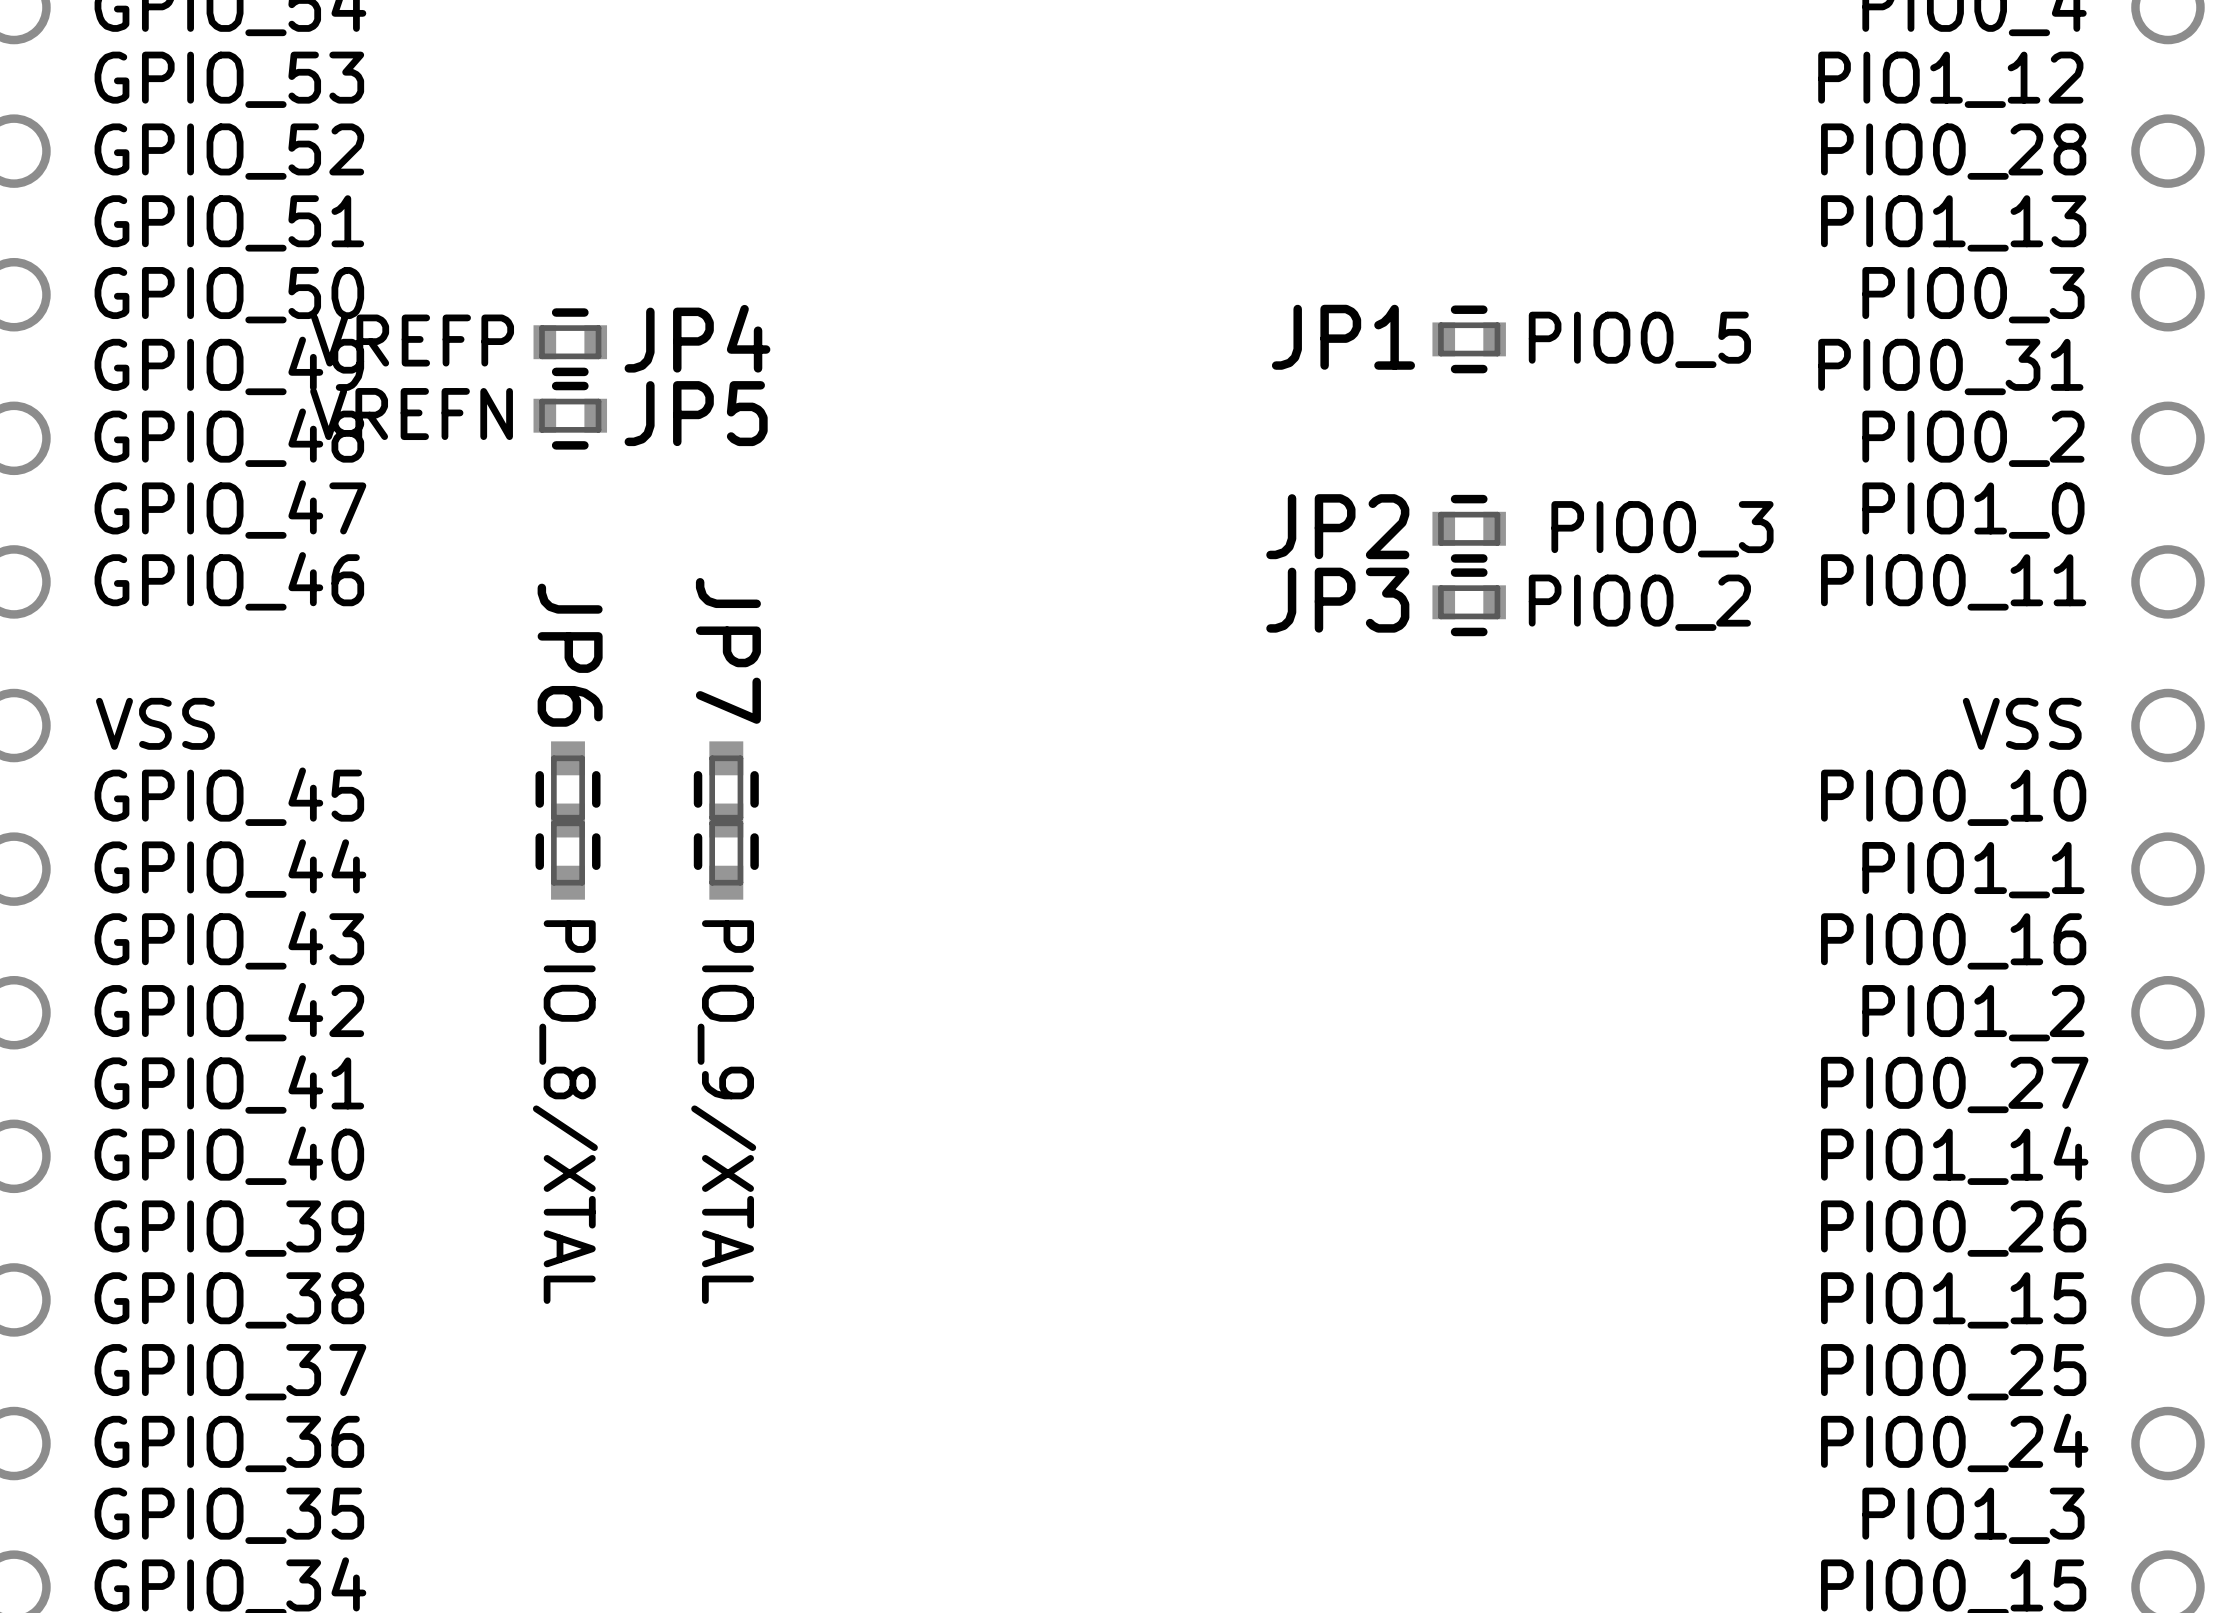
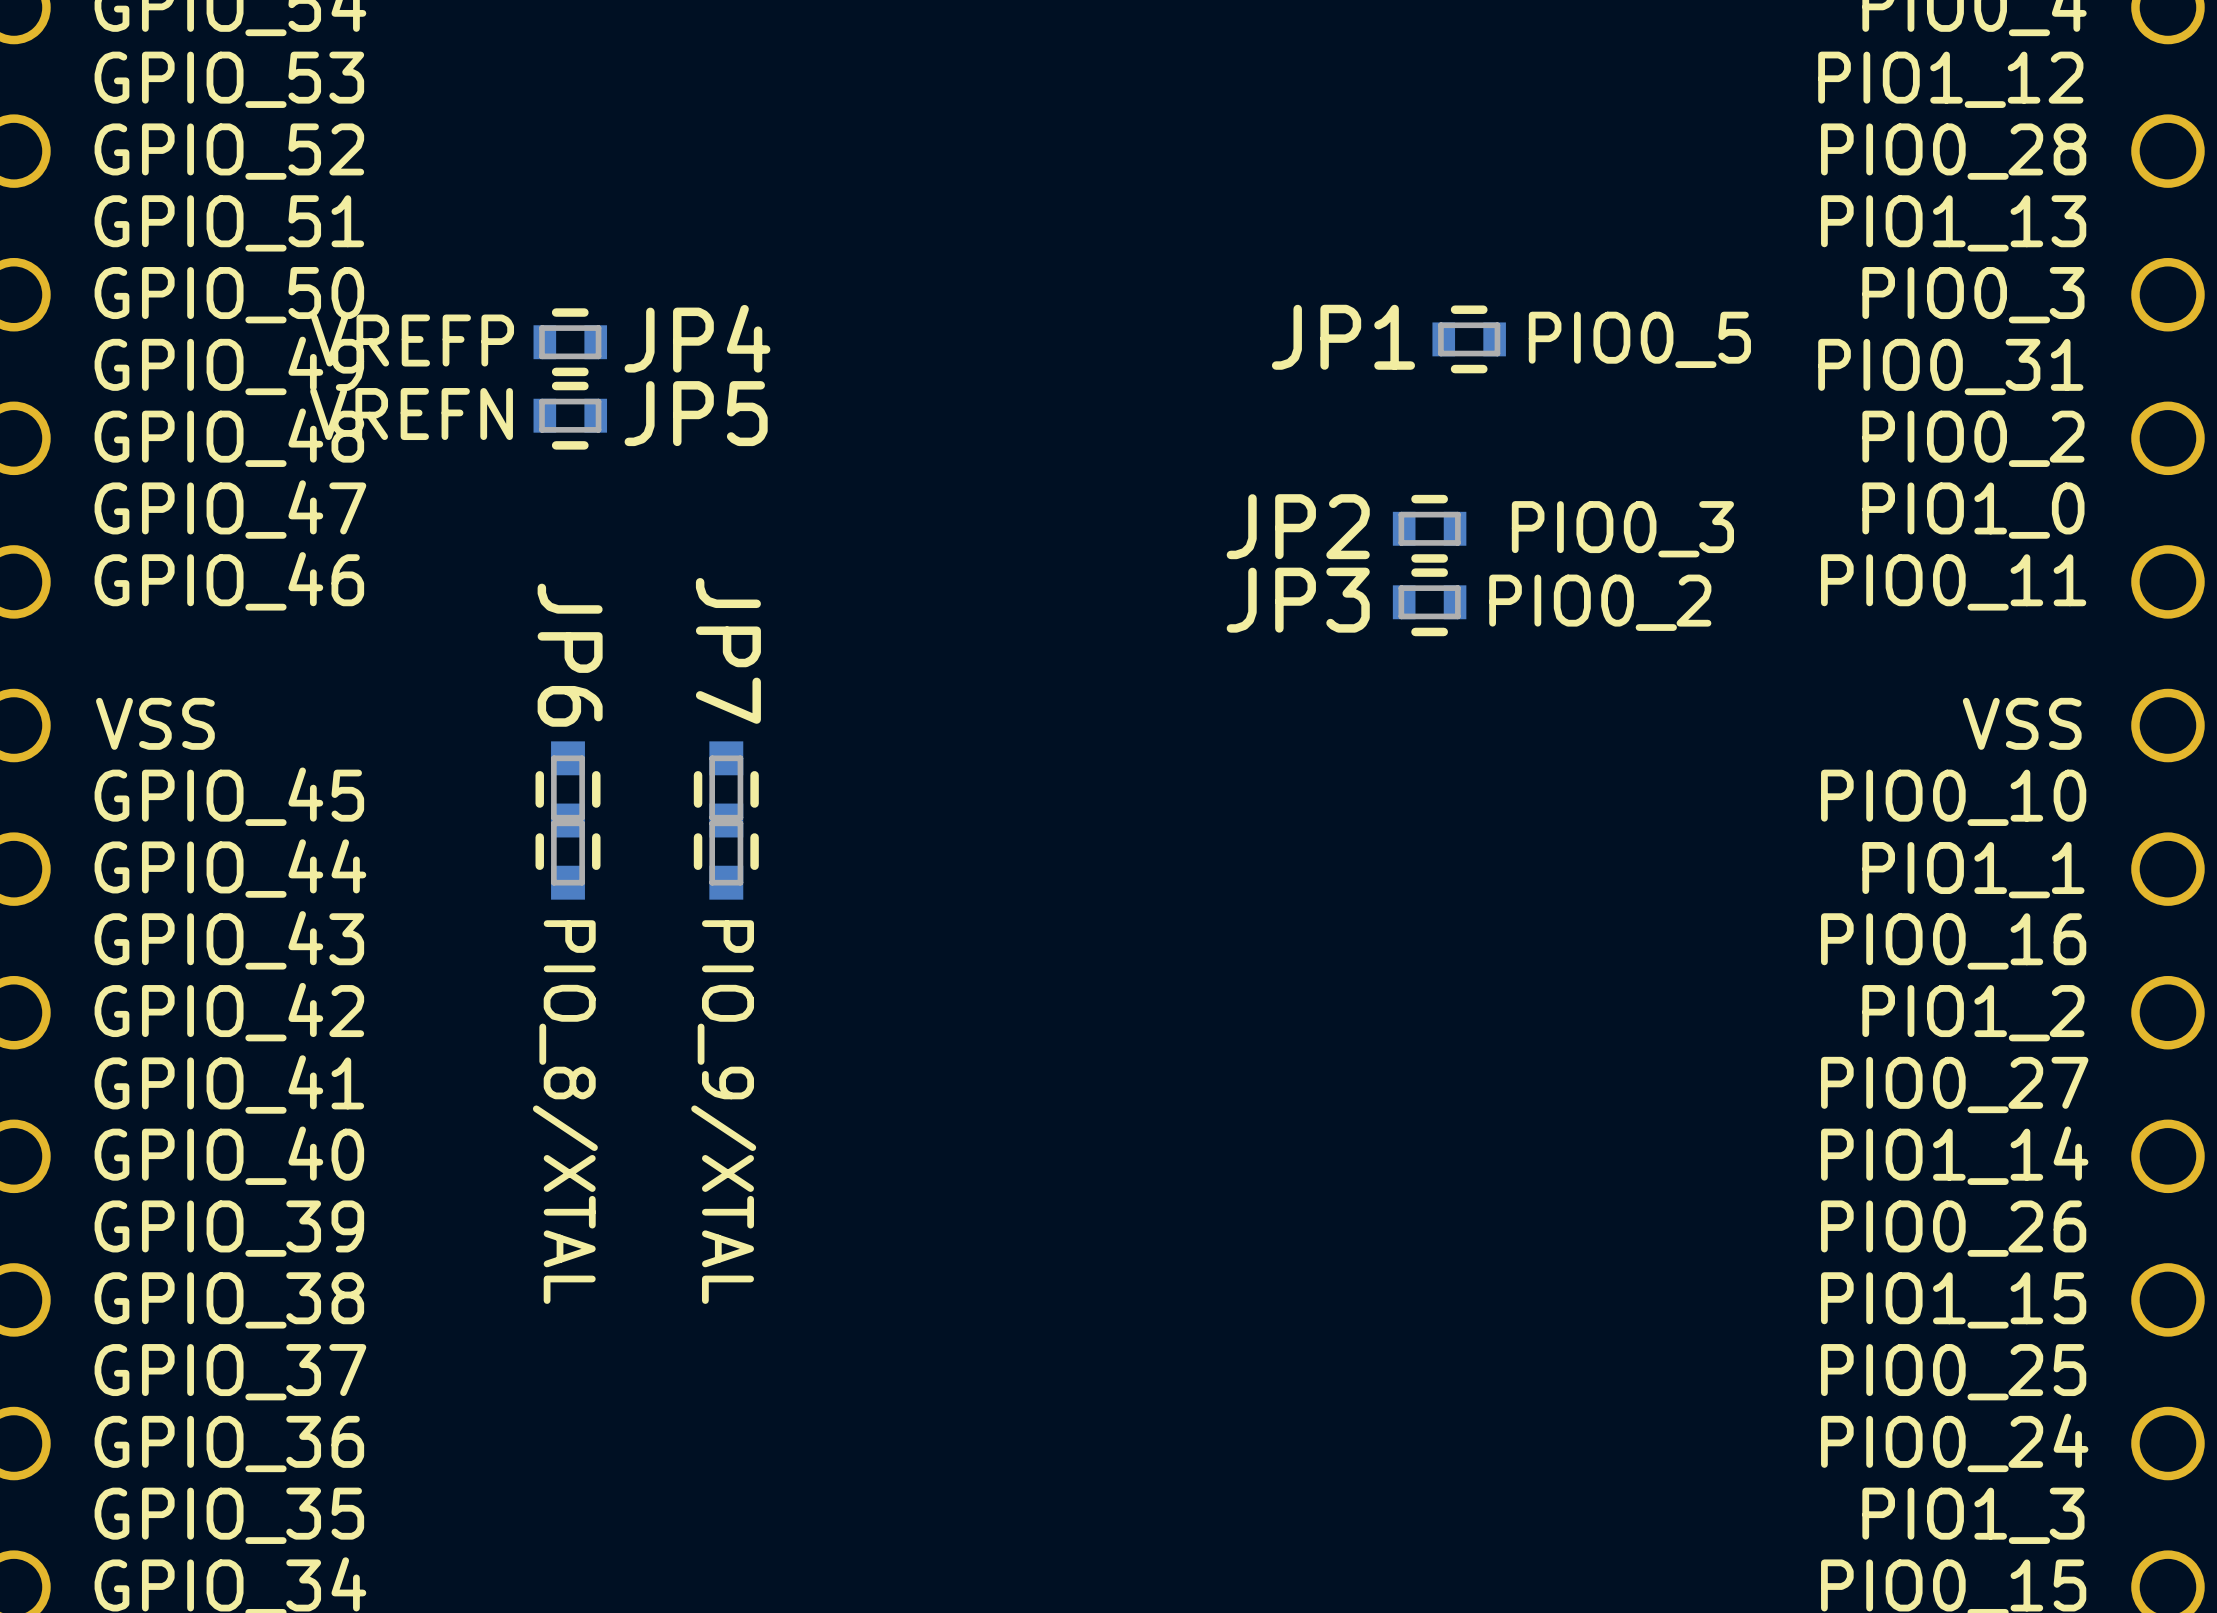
JP2 position: (1469, 528) -> (1429, 528)
JP3 position: (1469, 602) -> (1429, 602)

